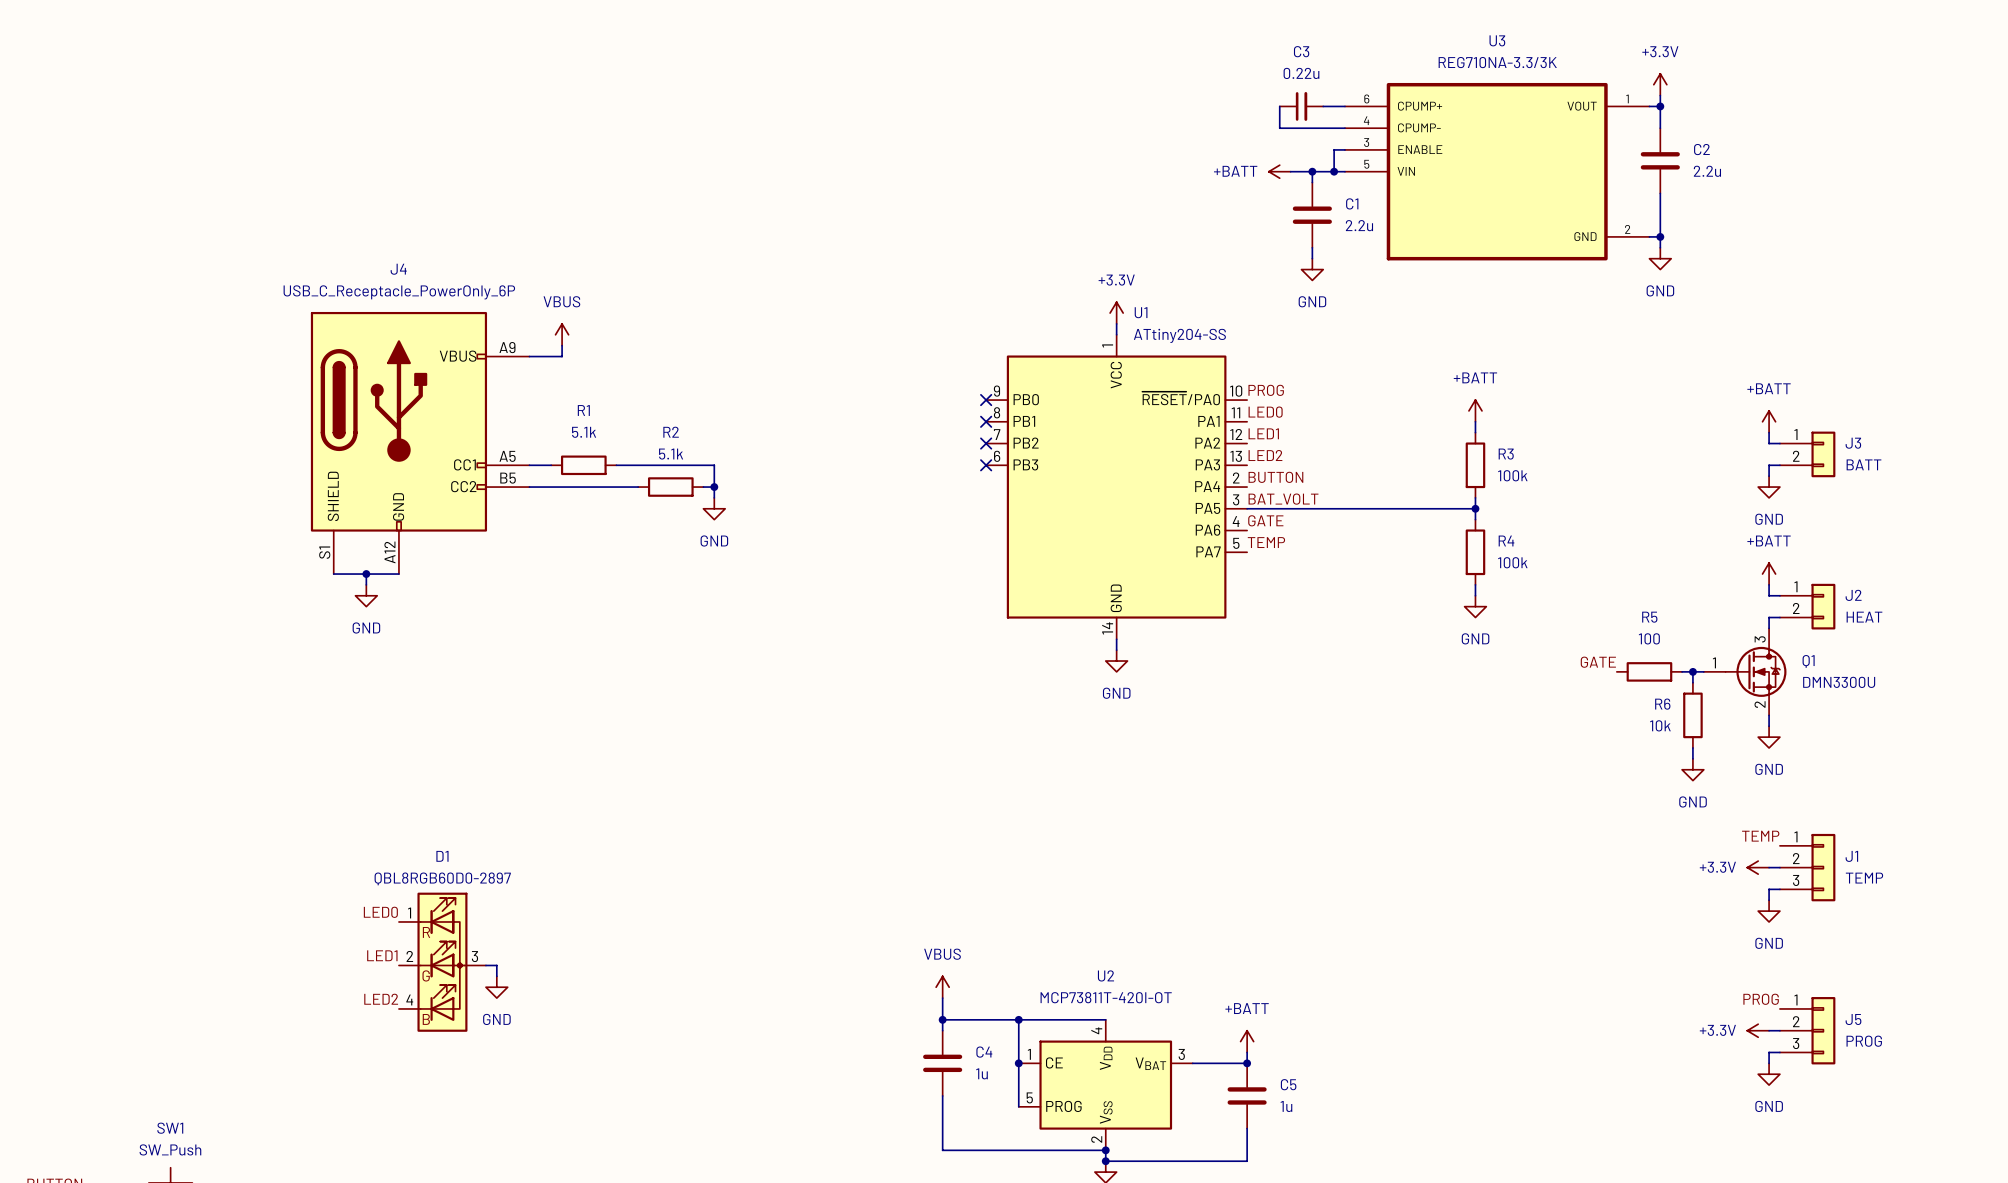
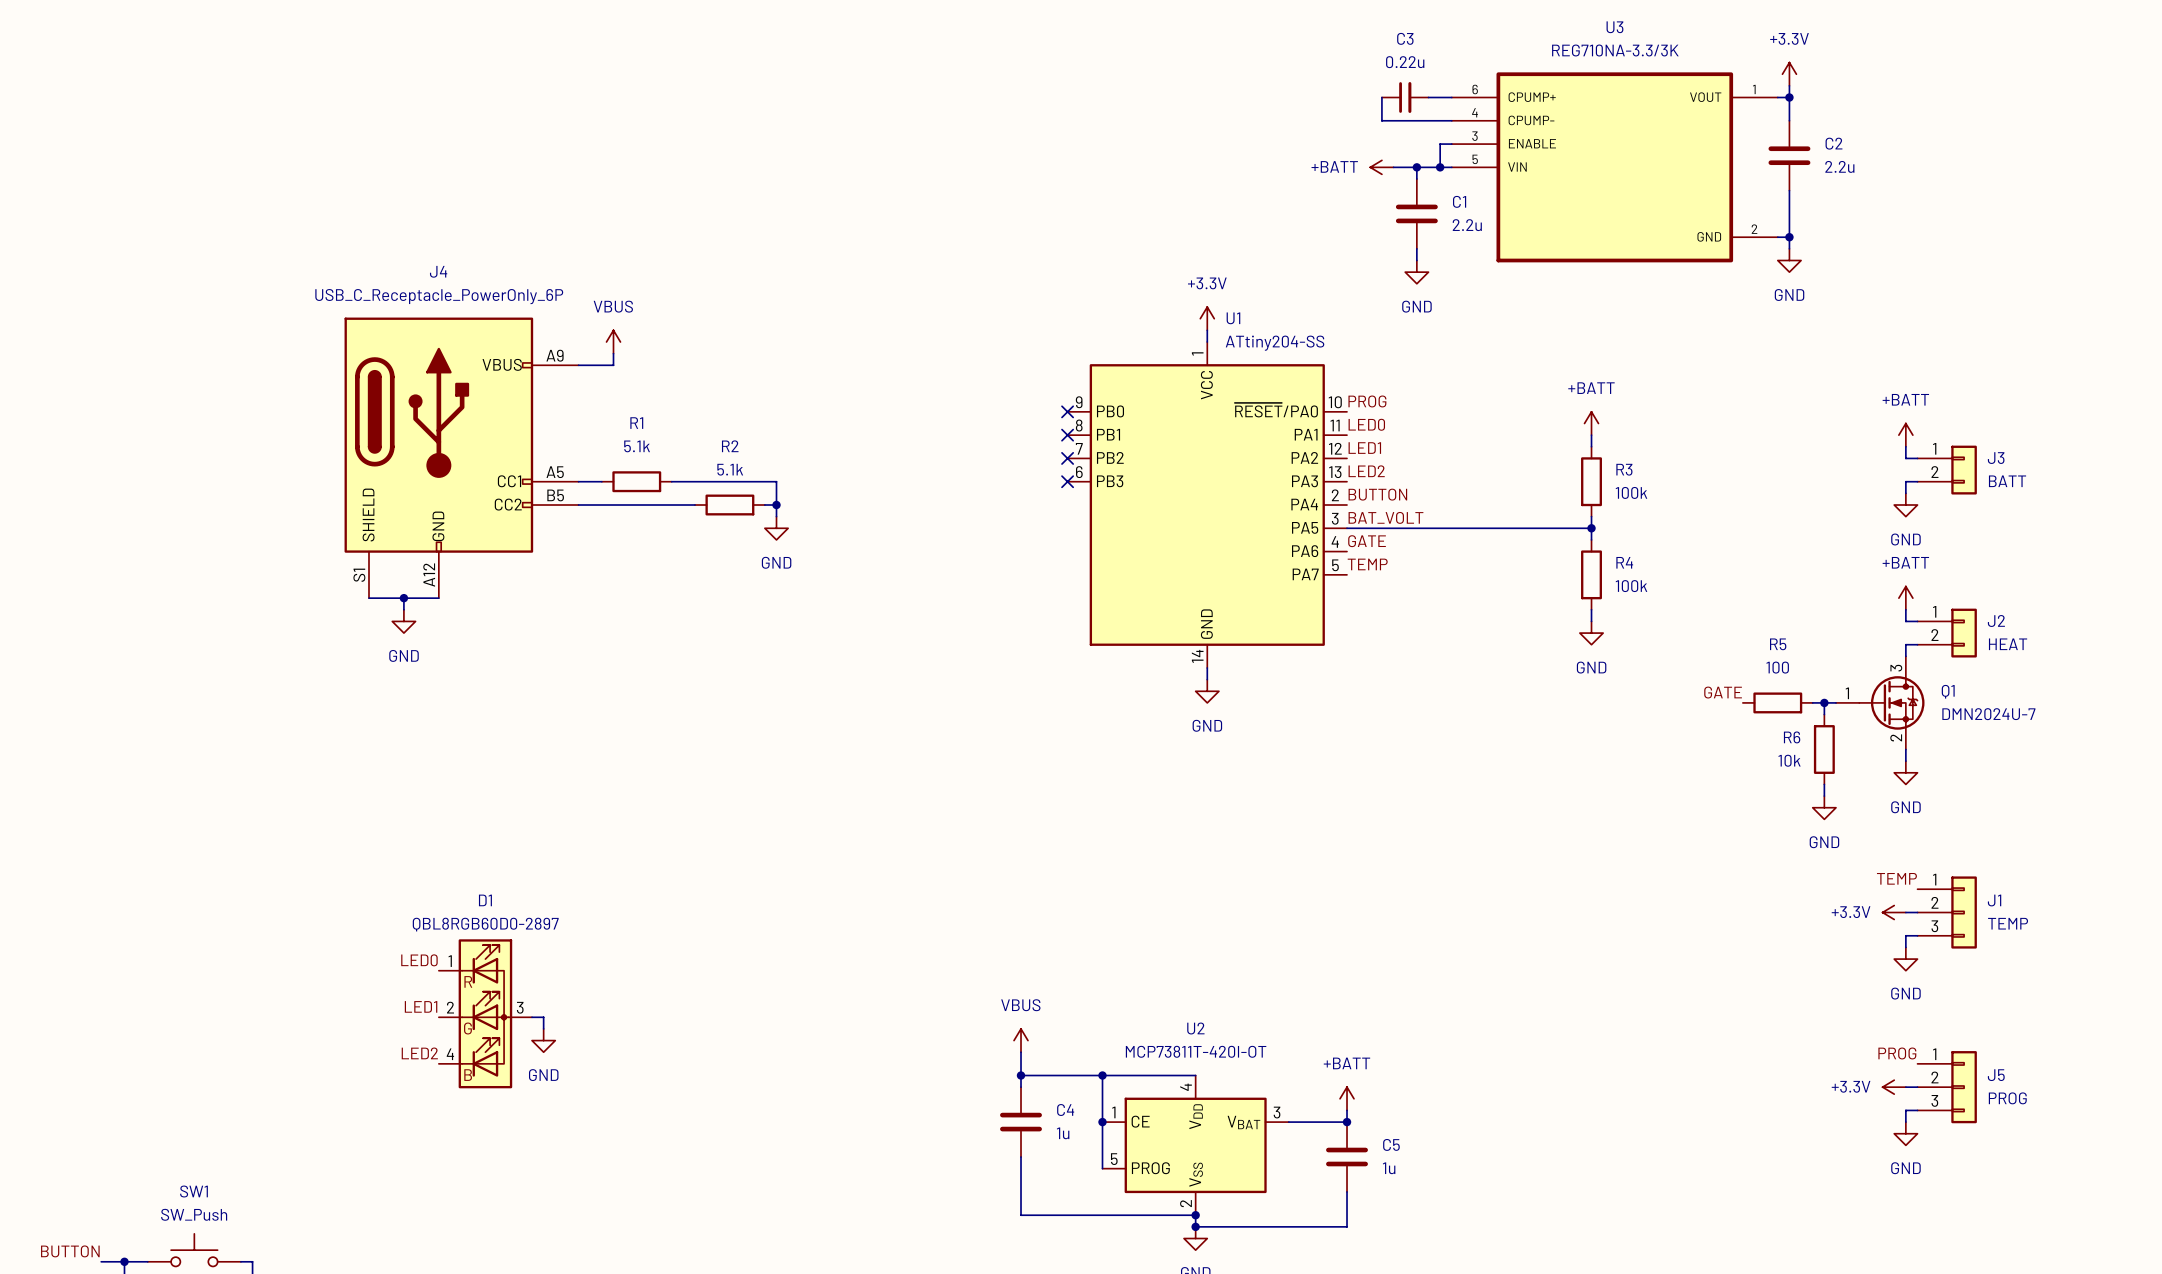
Q1 value: DMN3300U (1839, 682) -> DMN2024U-7 (1988, 714)

